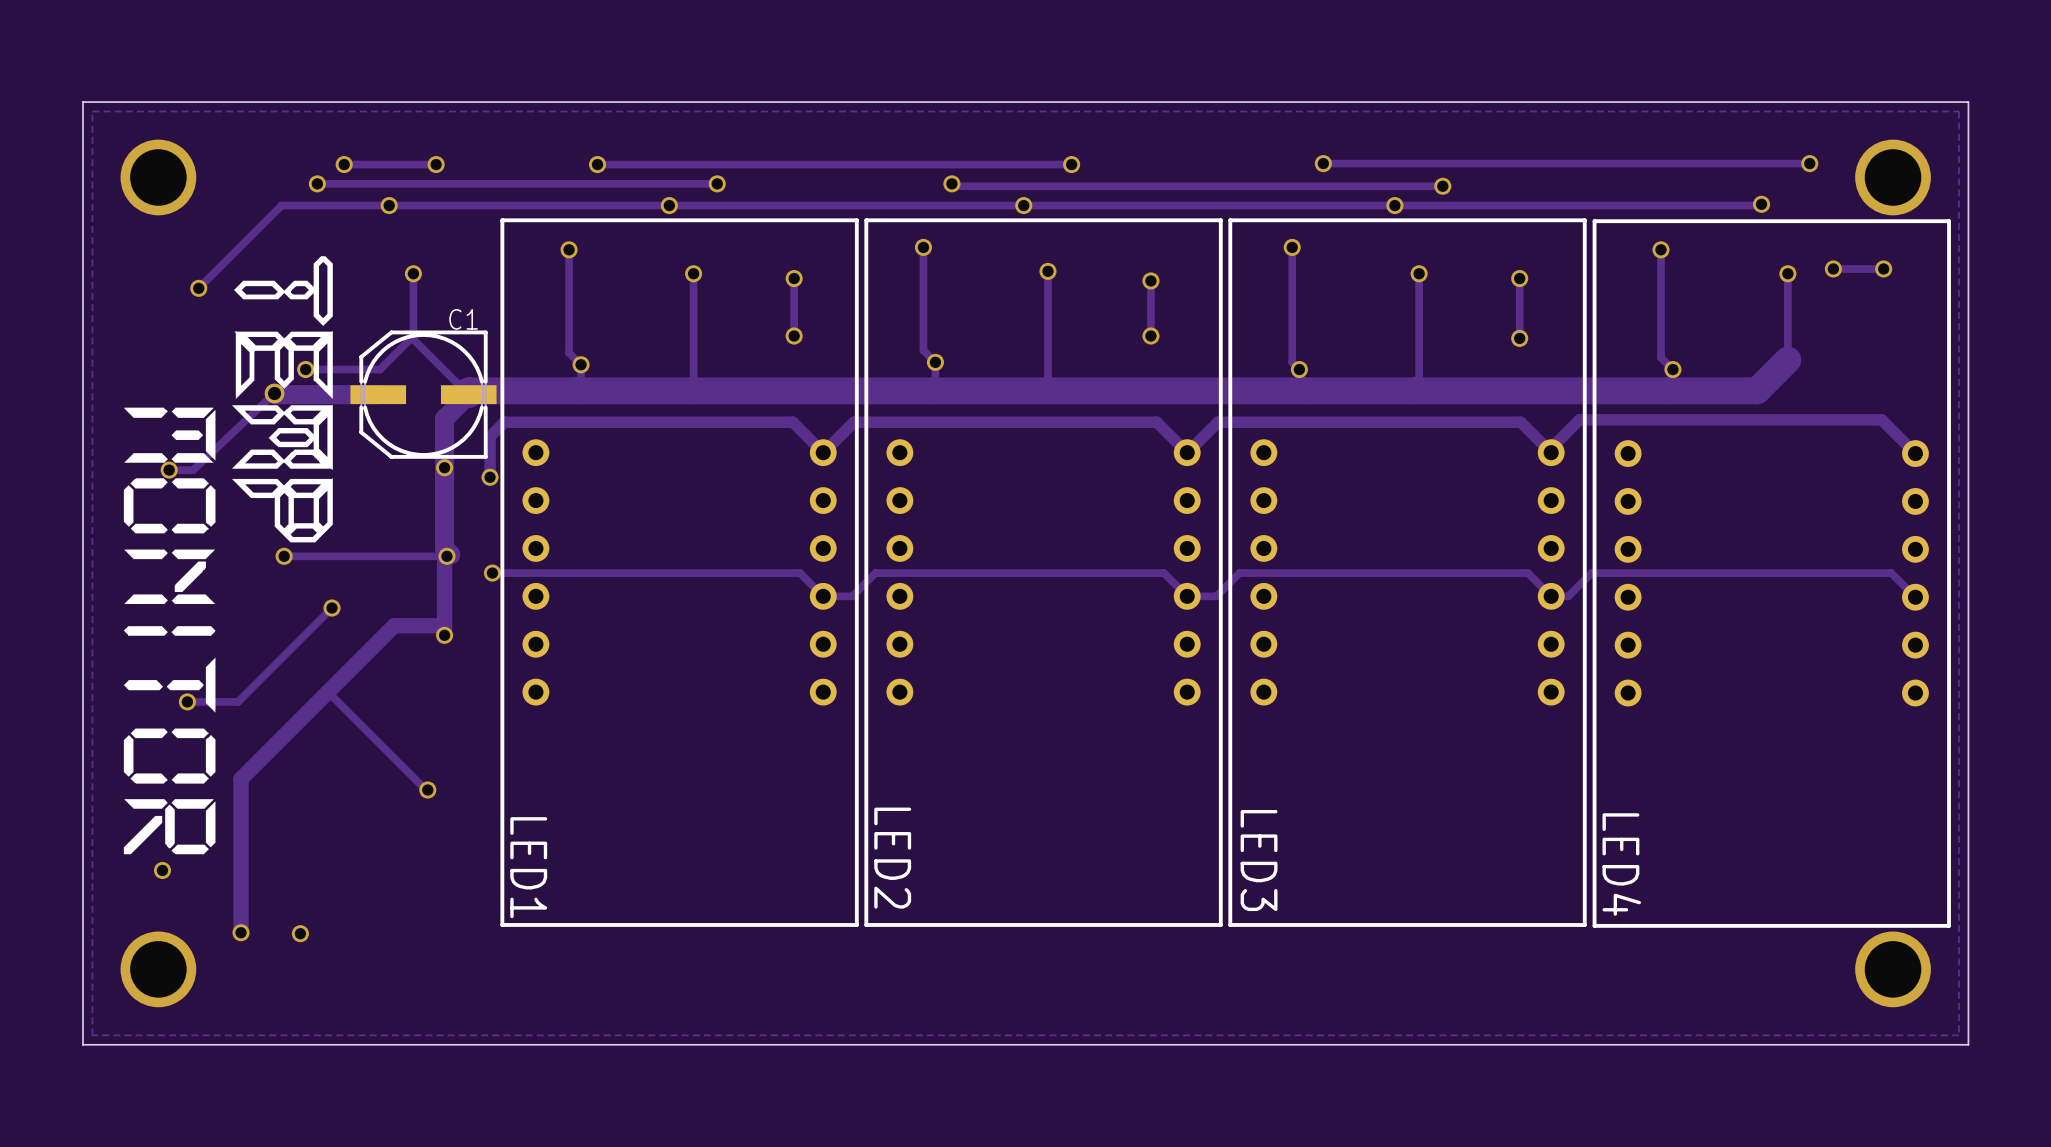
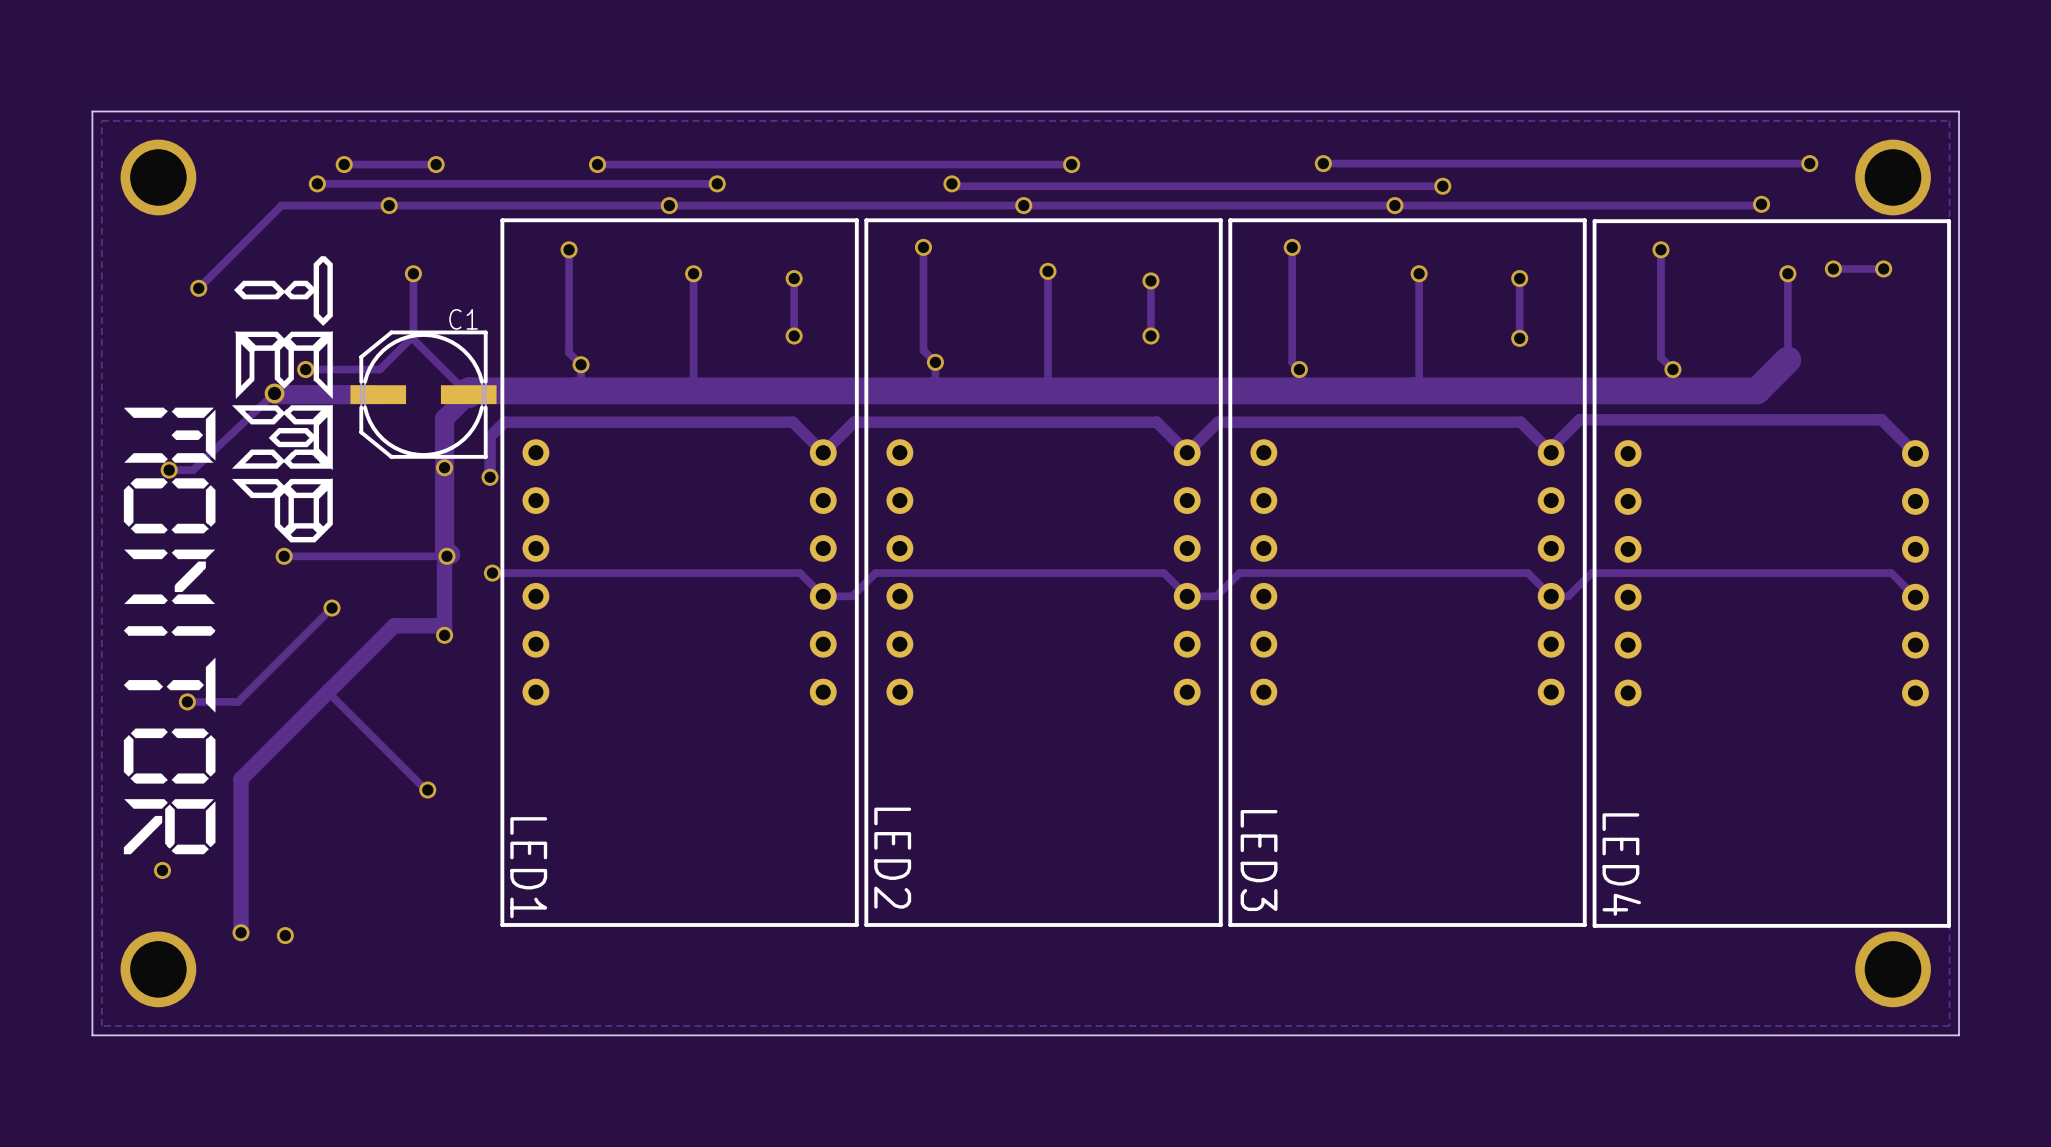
board edge: (82, 102) (1968, 102) (1968, 1044) (82, 1044) (82, 102) -> (92, 111) (92, 1035) (1959, 1035) (1959, 111) (92, 111)
zone outline: (92, 111) (1959, 111) (1959, 1035) (92, 1035) (92, 111) -> (101, 120) (101, 1025) (1949, 1025) (1949, 120) (101, 120)
via position: (300, 933) -> (285, 935)

